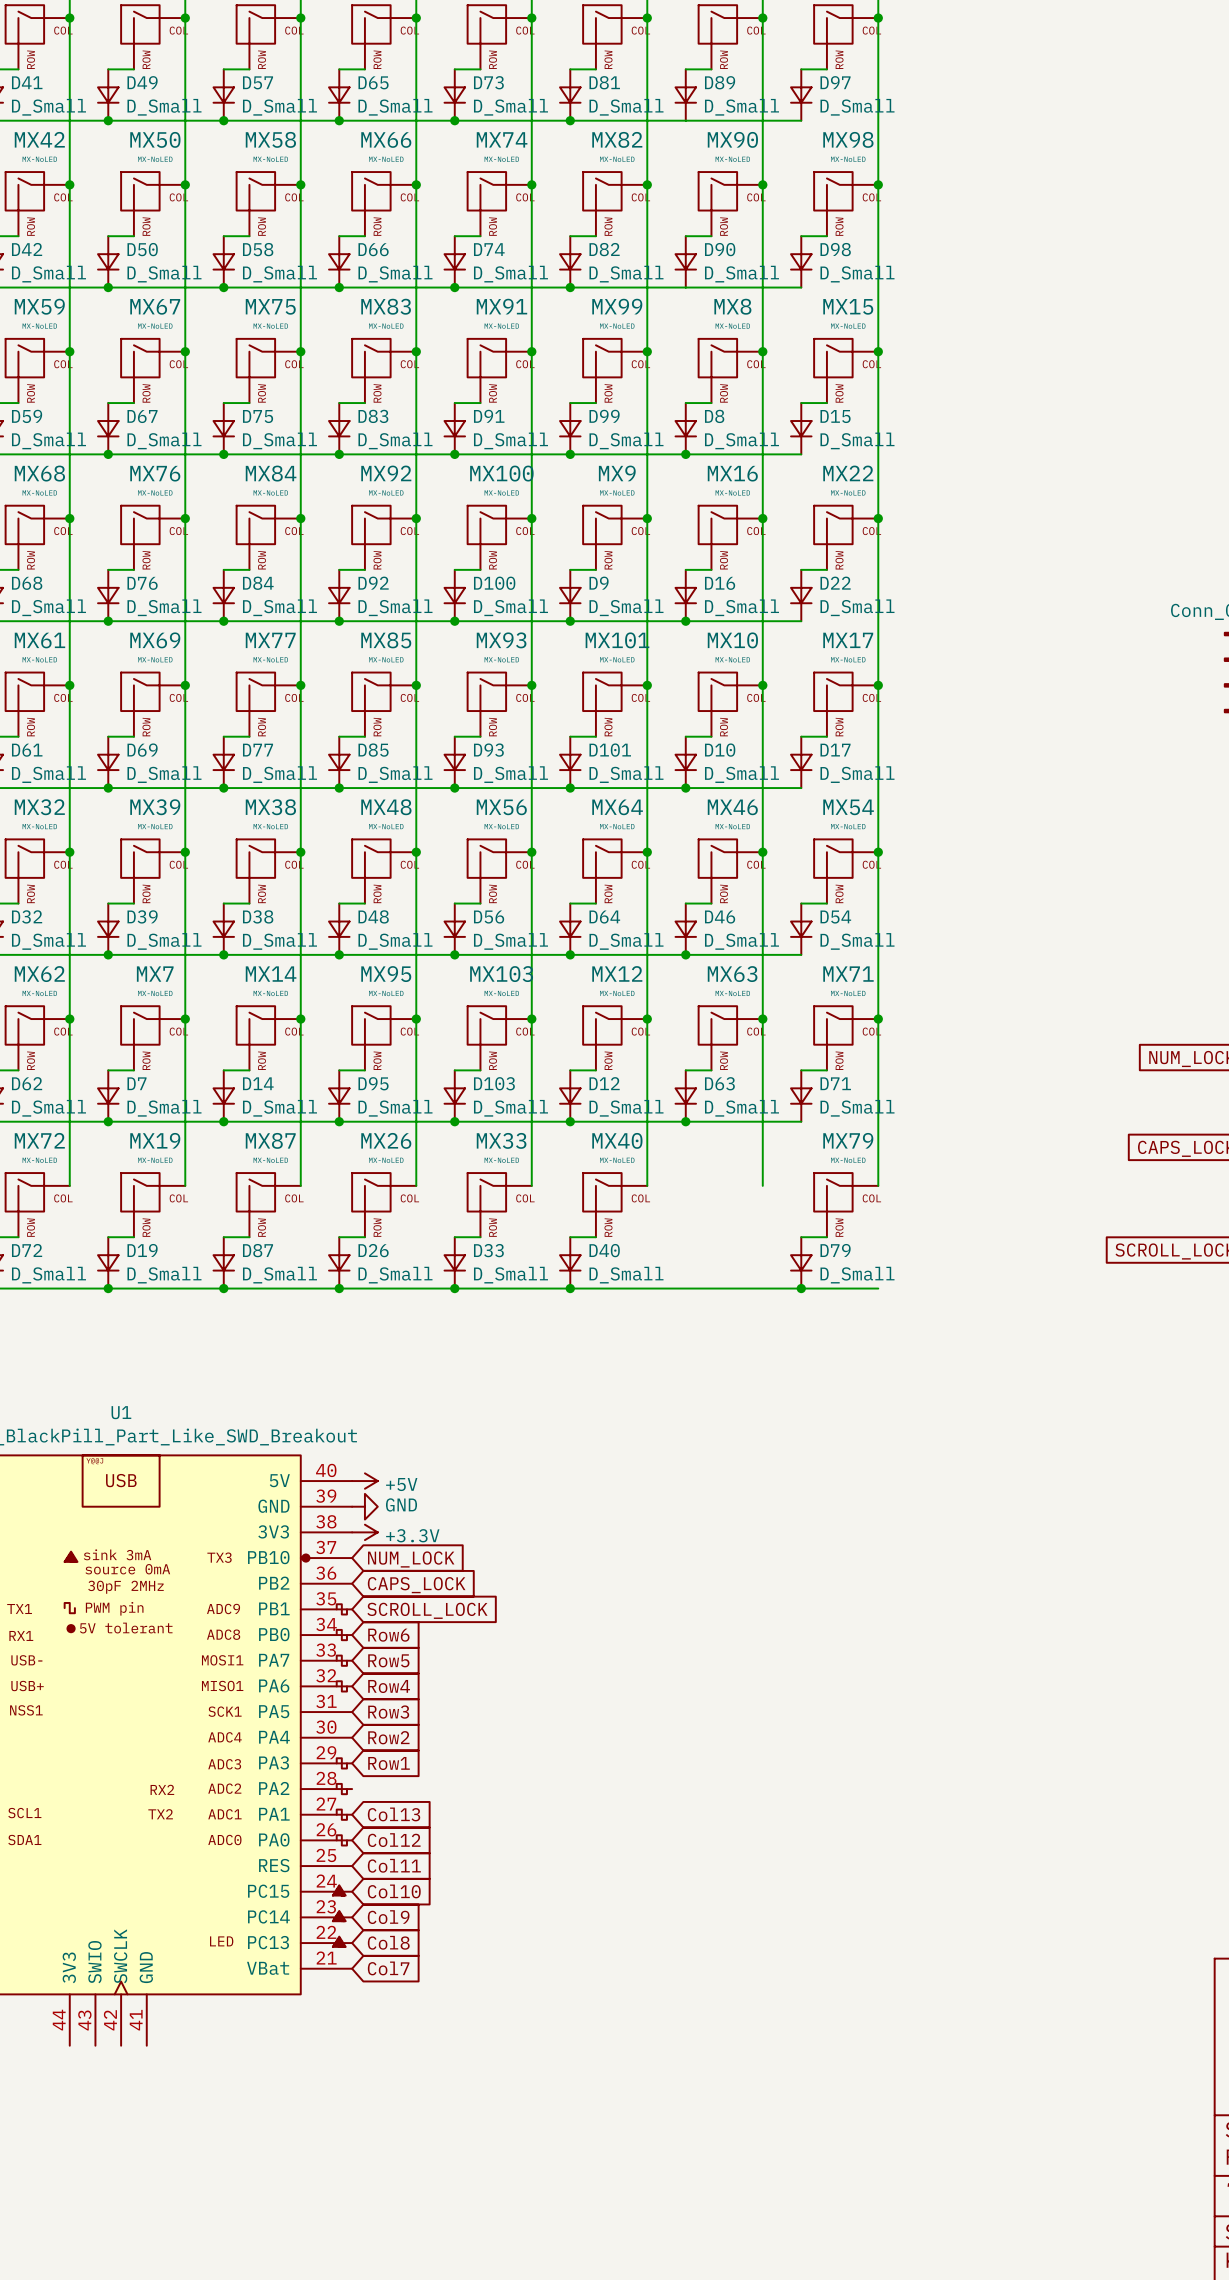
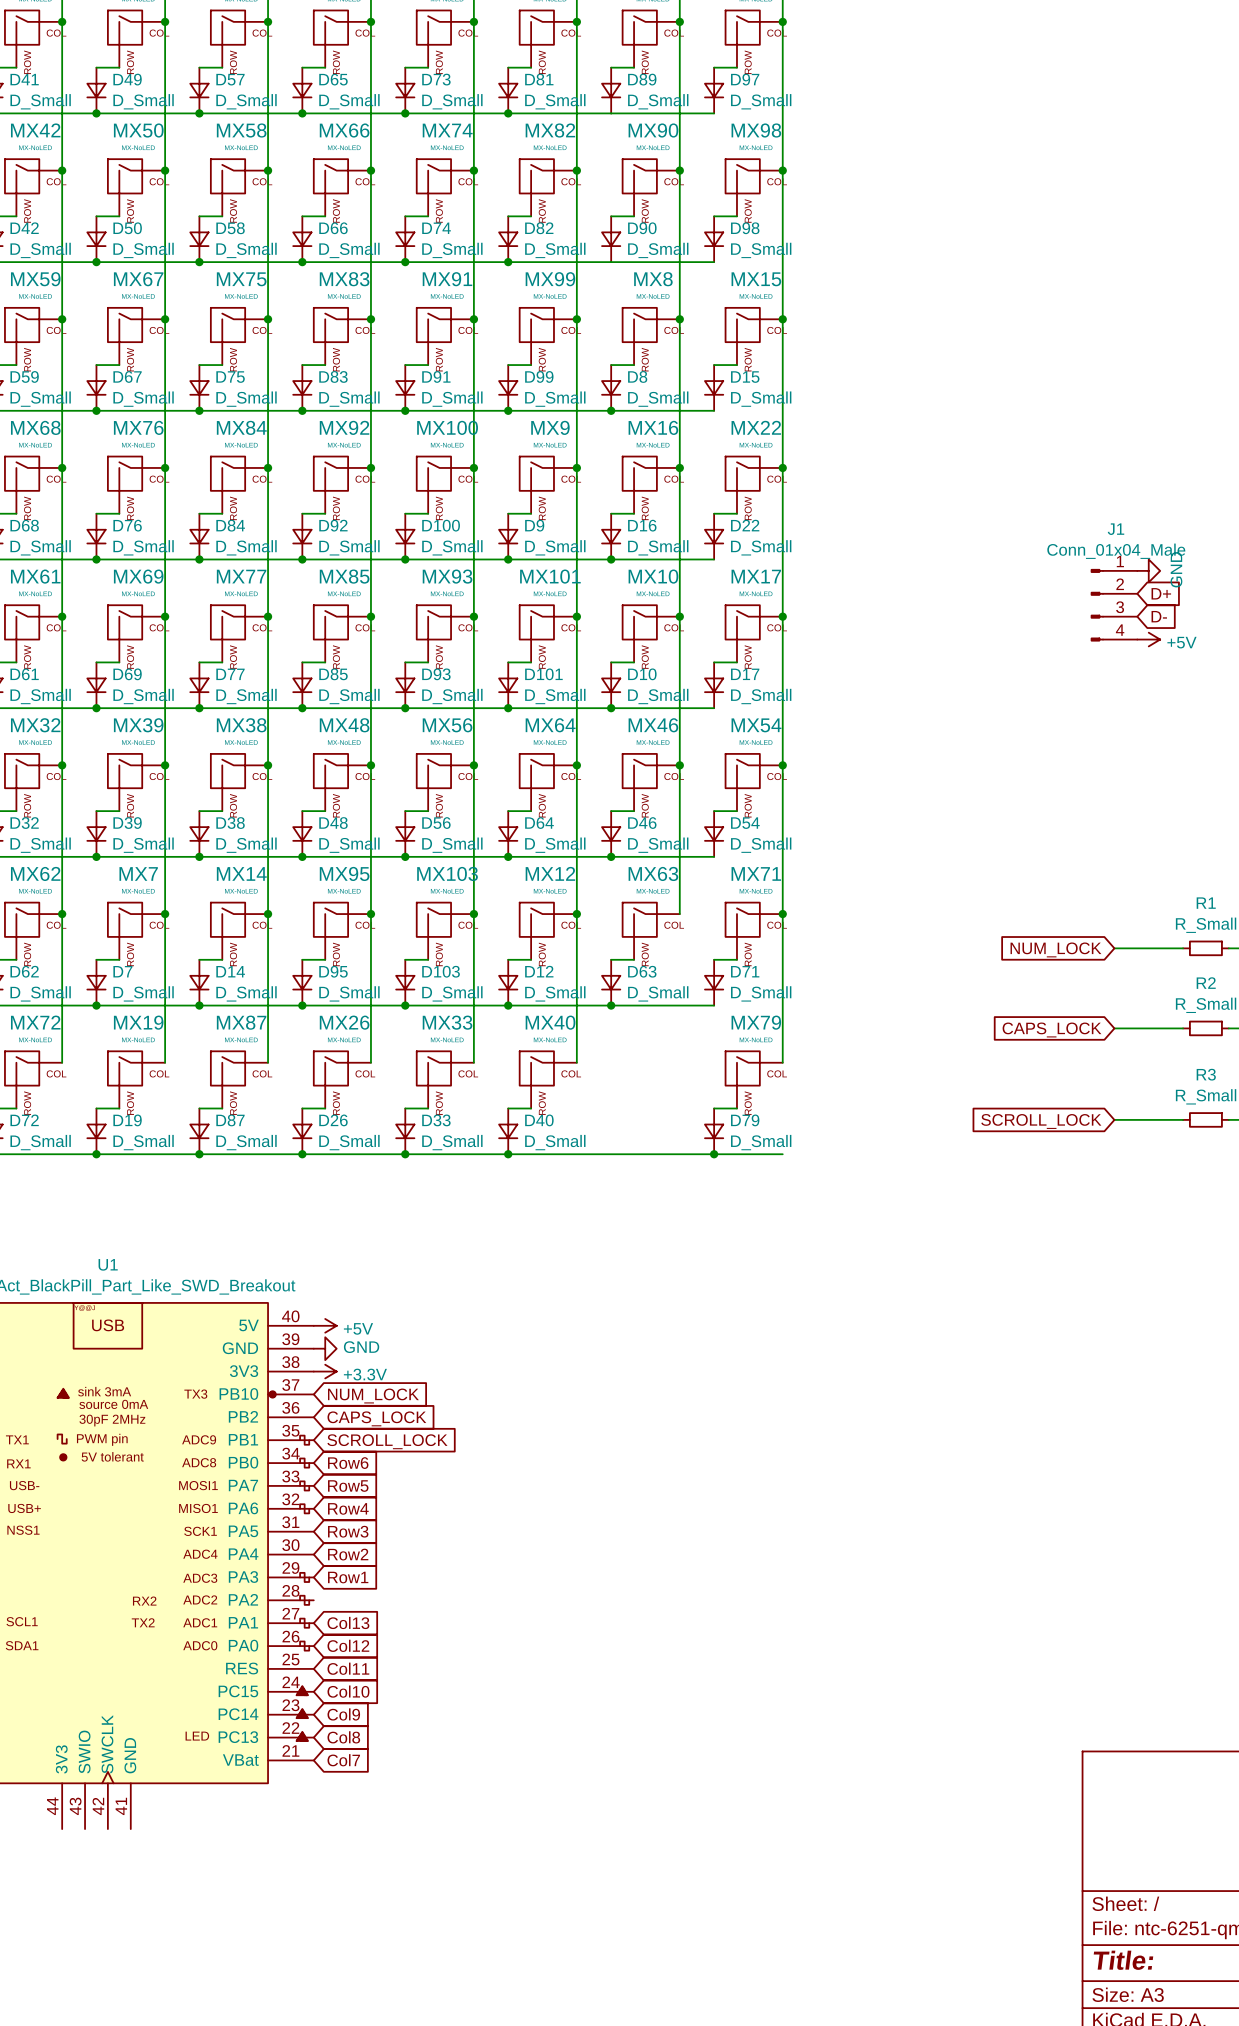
wire: (762, 1019) (762, 1185) -> none
junction: (762, 1019) -> none

